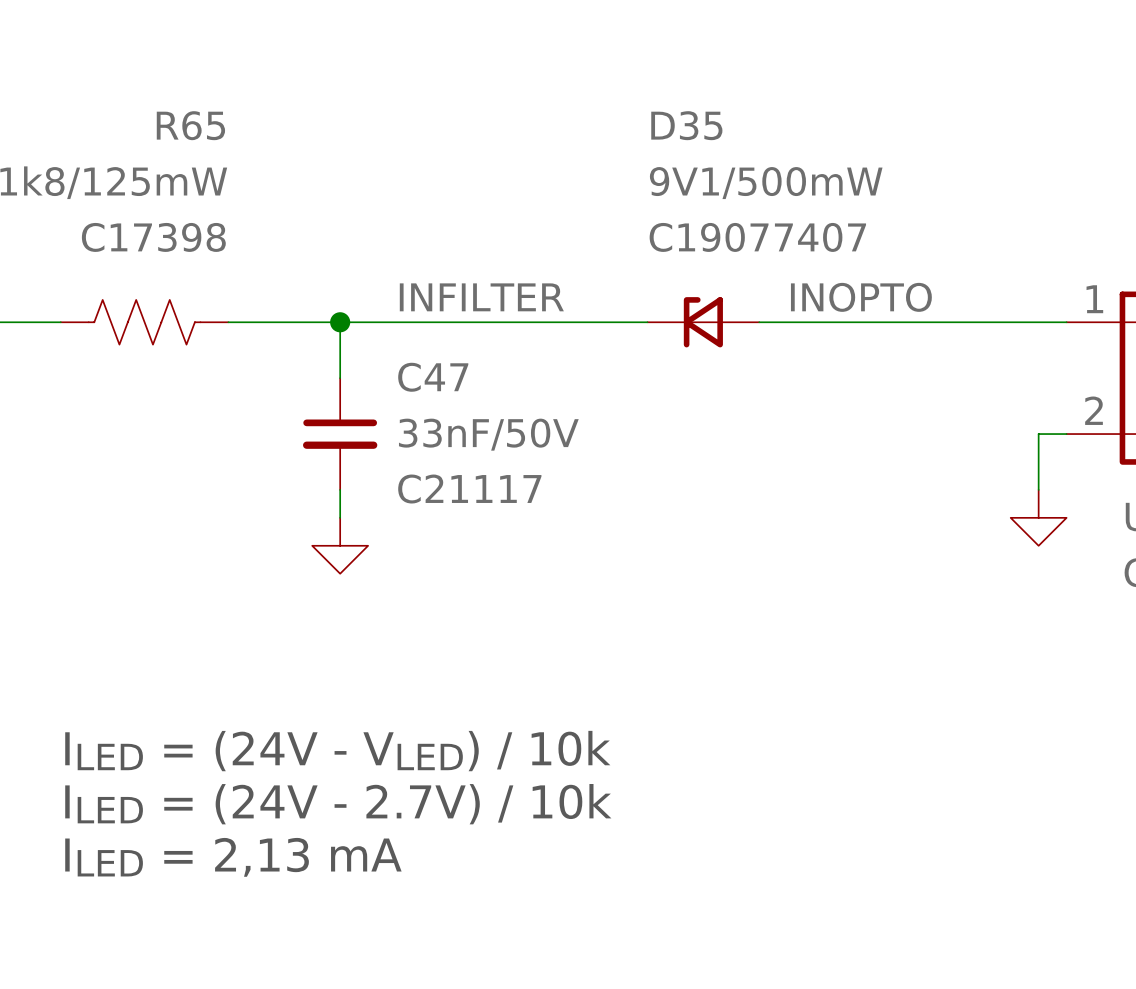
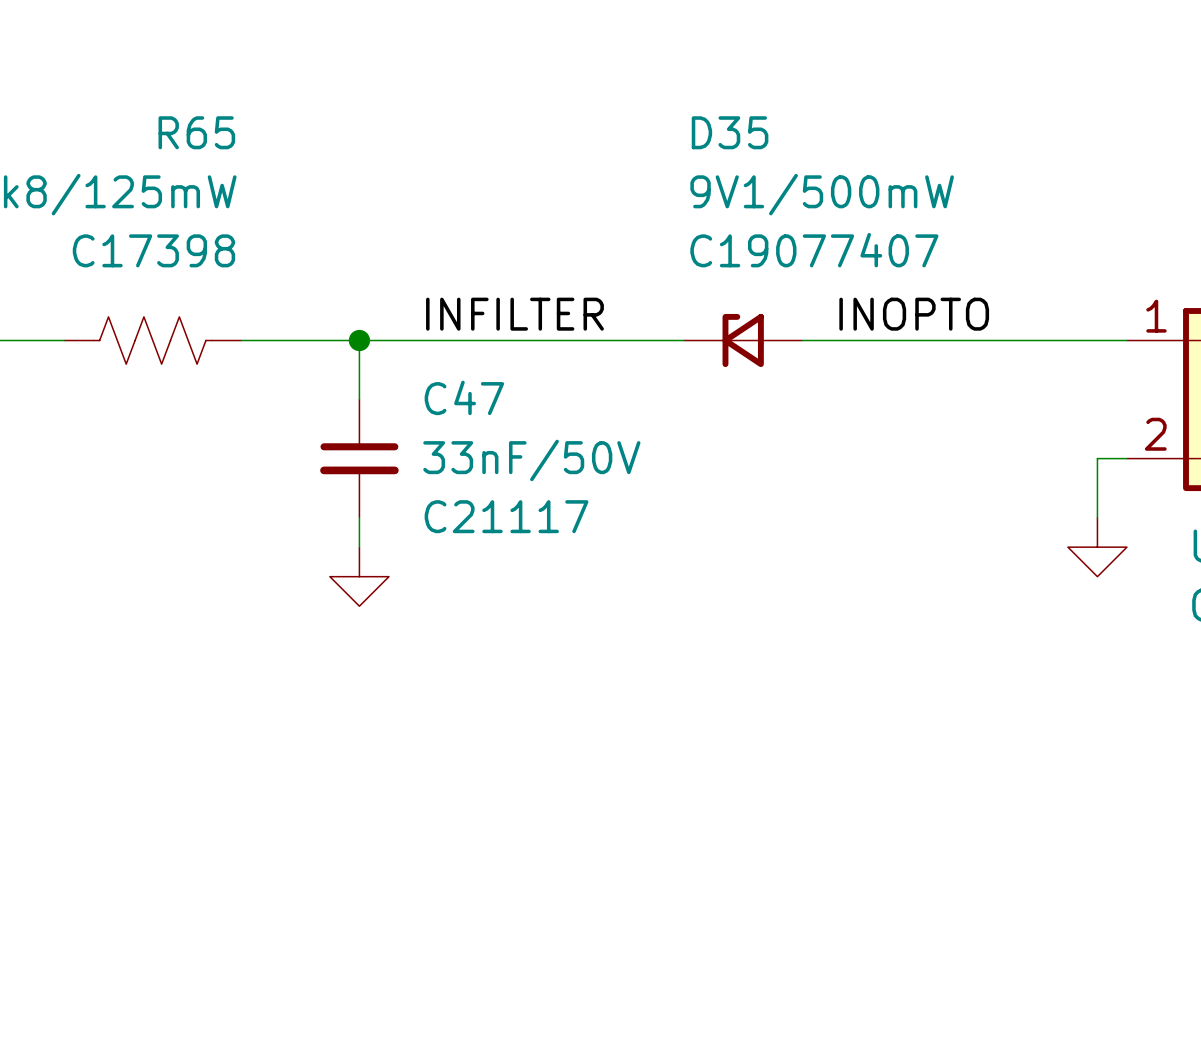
text: ILED = (24V - VLED) / 10k (337, 751) -> none
text: ILED = (24V - 2.7V) / 10k (338, 804) -> none
text: ILED = 2,13 mA (233, 857) -> none

